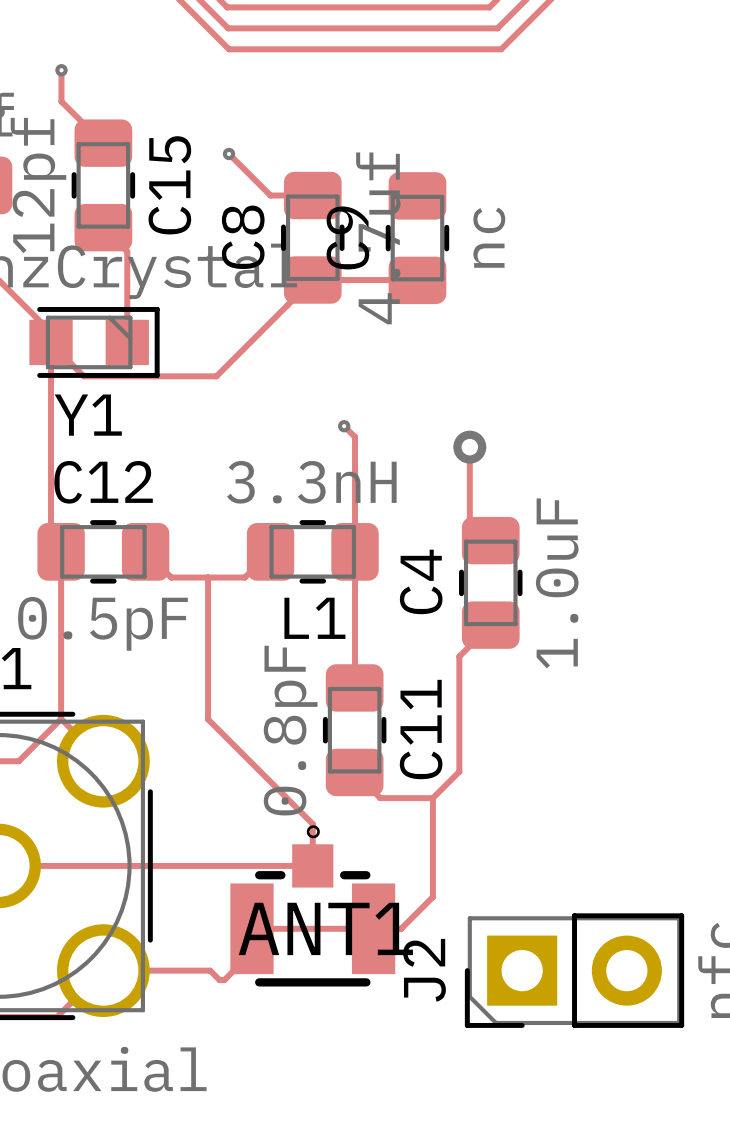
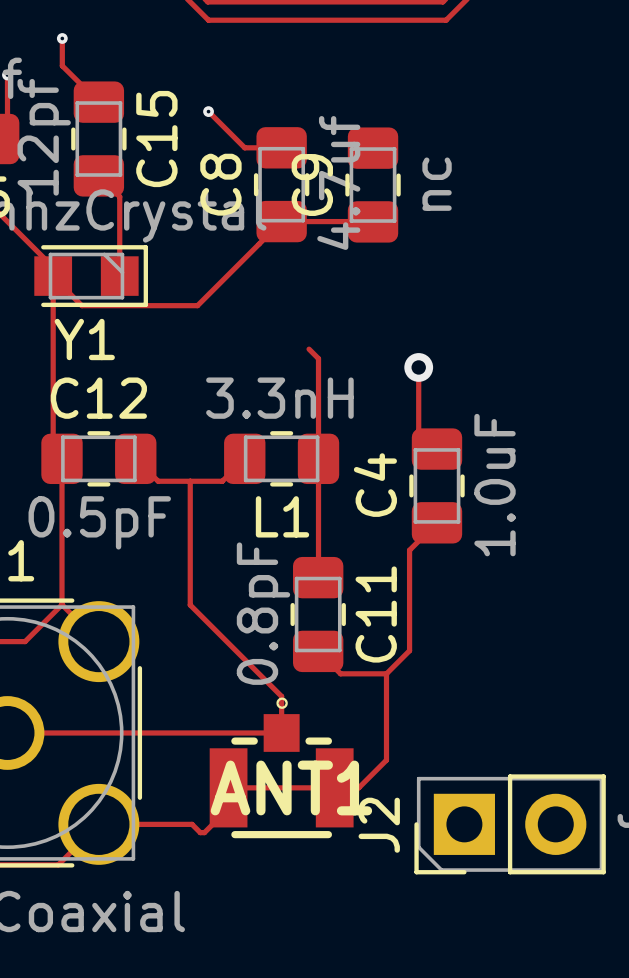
via: (344, 426) -> none

